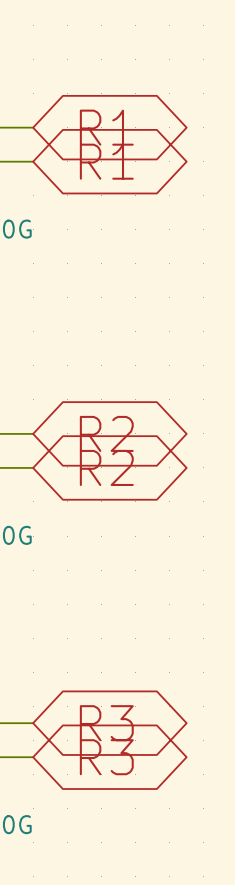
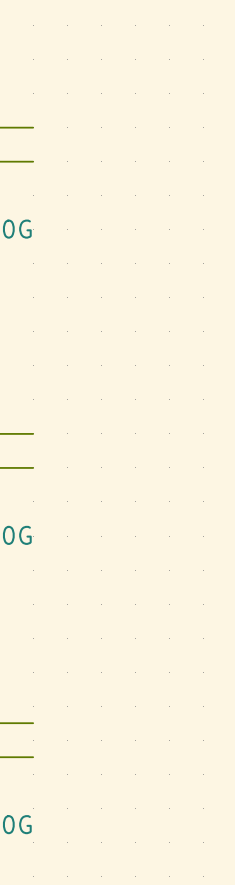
global label: R1 (106, 127) -> none
global label: R1 (106, 161) -> none
global label: R2 (106, 433) -> none
global label: R2 (106, 467) -> none
global label: R3 (106, 723) -> none
global label: R3 (106, 757) -> none

